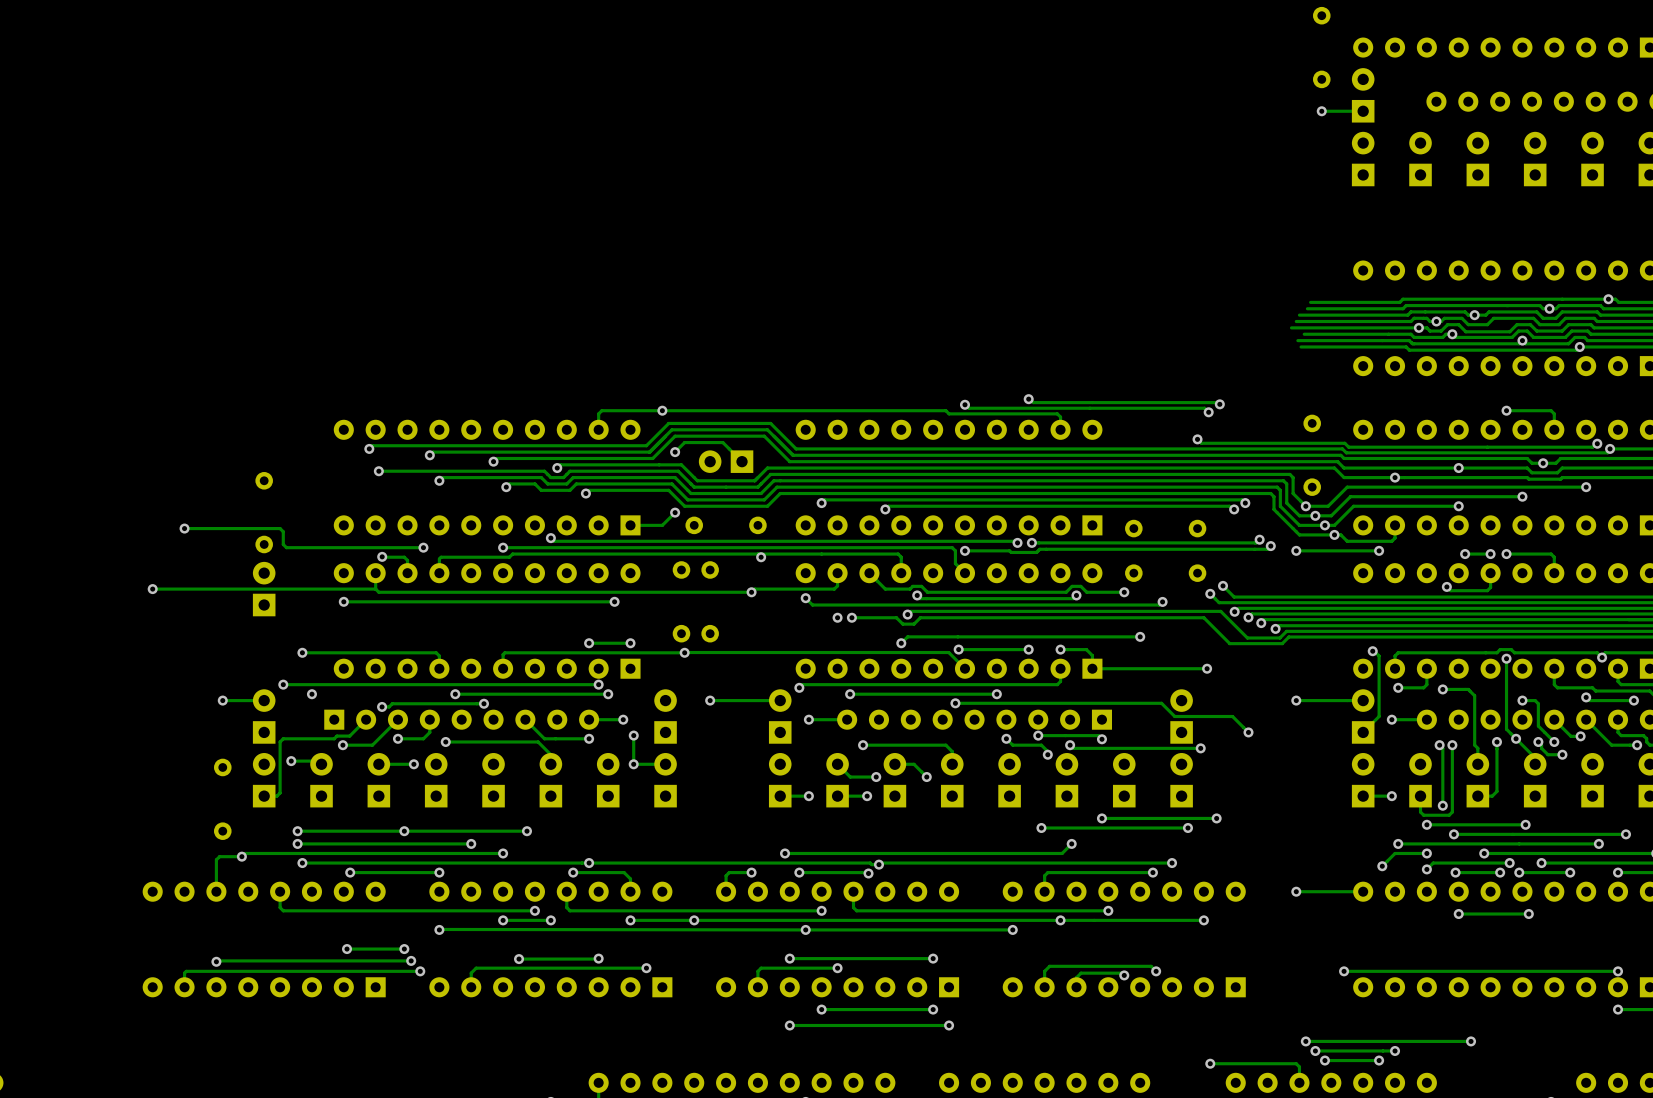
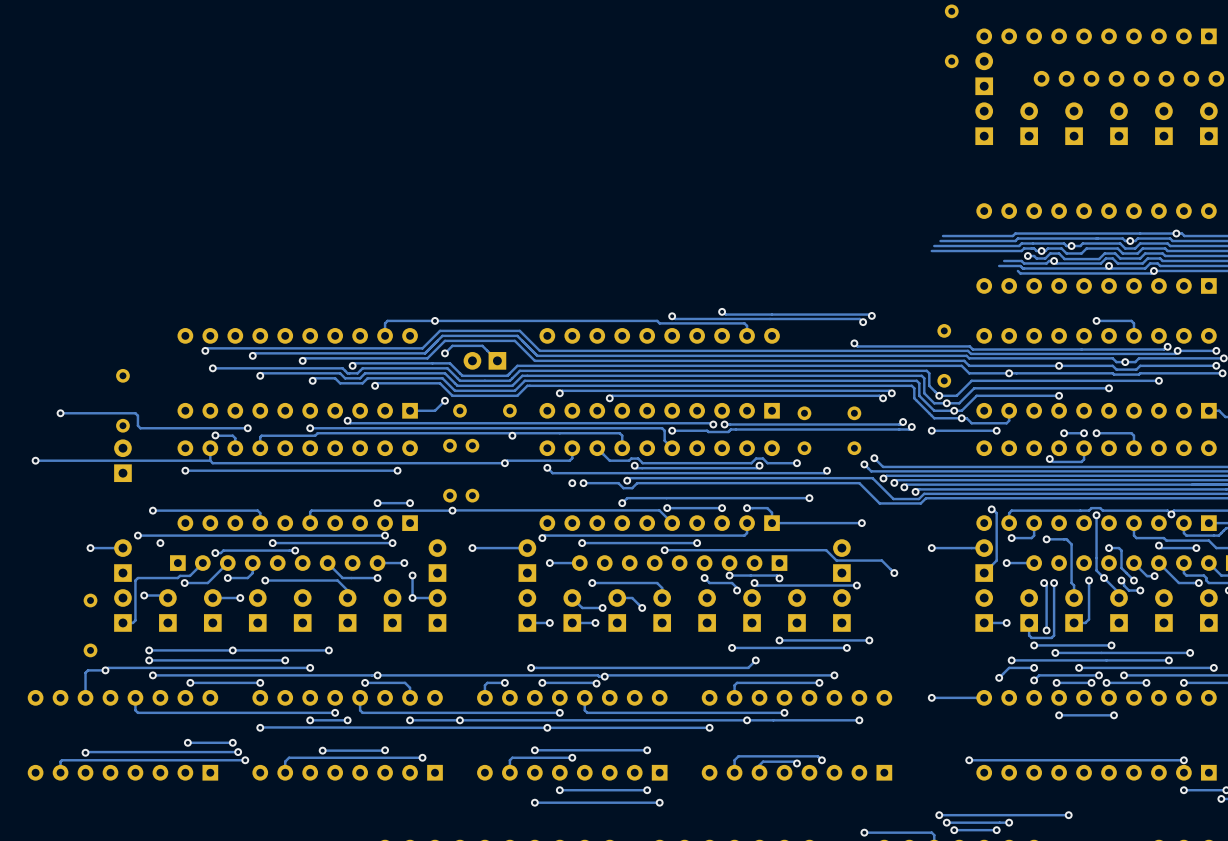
via: (1321, 111) -> none
track: (1363, 111) (1321, 111) -> none
track: (1418, 327) (1291, 327) -> none
track: (1388, 334) (1304, 334) -> none
track: (1382, 340) (1297, 340) -> none
track: (1406, 346) (1301, 346) -> none

